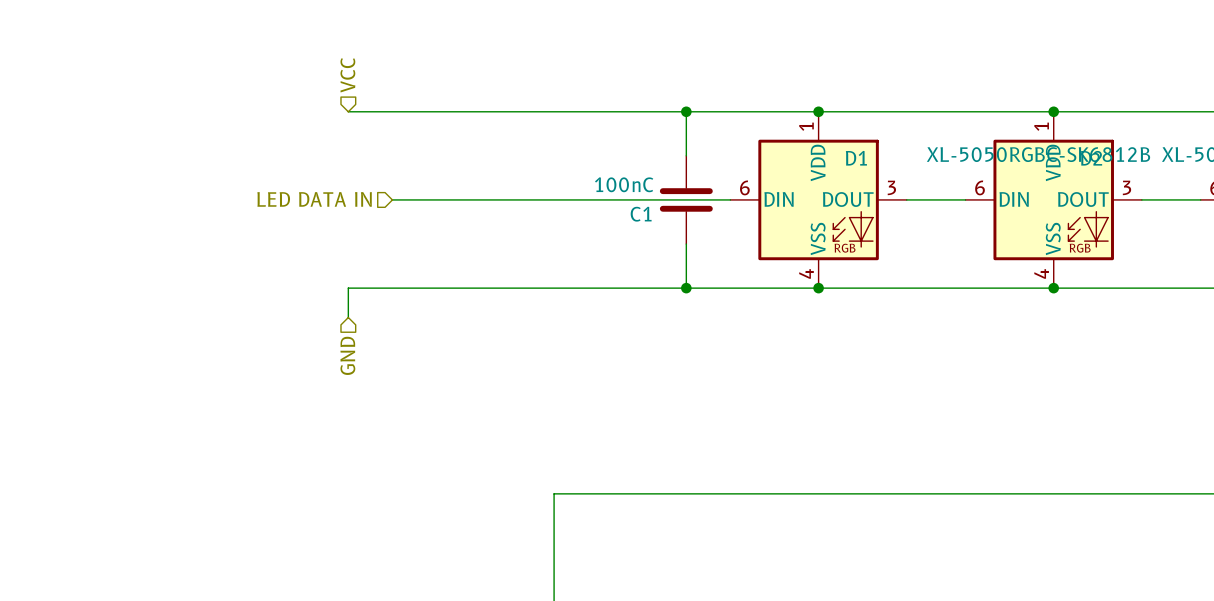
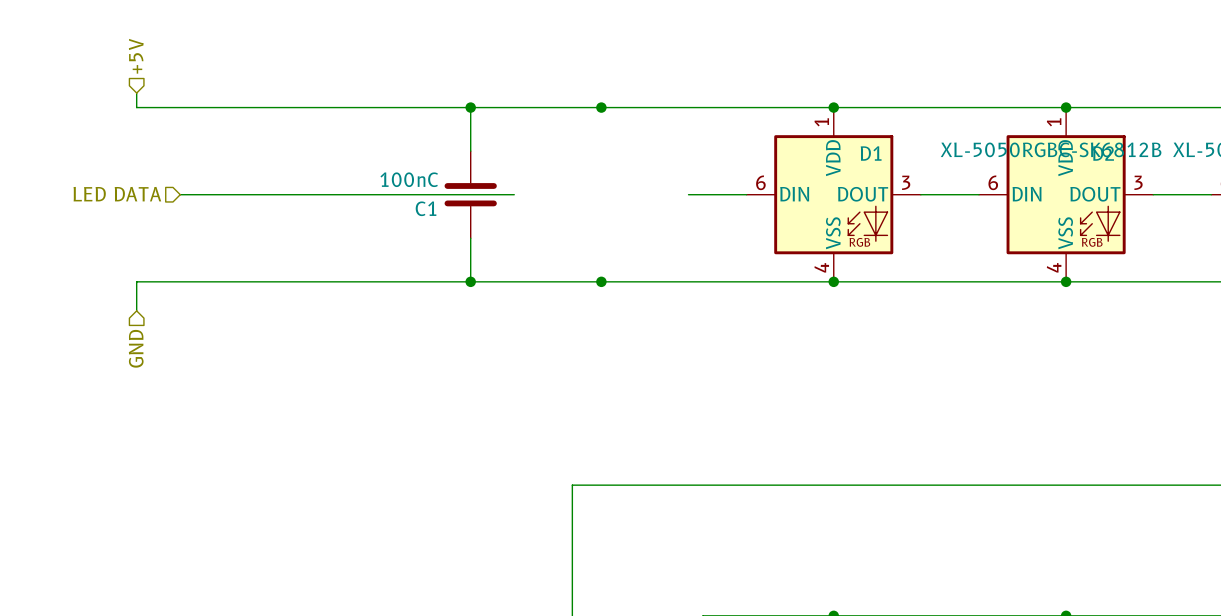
hierarchical label: none -> +5V (136, 56)
hierarchical label: VCC (347, 75) -> none
wire: none -> (136, 93) (136, 107) (369, 107)
junction: none -> (470, 107)
junction: none -> (601, 107)
wire: (686, 111) (686, 155) -> (470, 107) (470, 151)
junction: (686, 111) -> none
hierarchical label: none -> LED DATA (117, 194)
wire: none -> (180, 194) (412, 194)
hierarchical label: LED DATA IN (314, 199) -> none
wire: (495, 199) (671, 199) -> none
C1 position: (686, 199) -> (470, 194)
wire: (686, 244) (686, 288) -> (470, 238) (470, 281)
wire: (348, 288) (348, 317) -> (369, 281) (136, 281) (136, 310)
junction: none -> (470, 281)
junction: none -> (601, 281)
junction: (686, 288) -> none
hierarchical label position: GND (347, 355) -> GND (136, 348)

